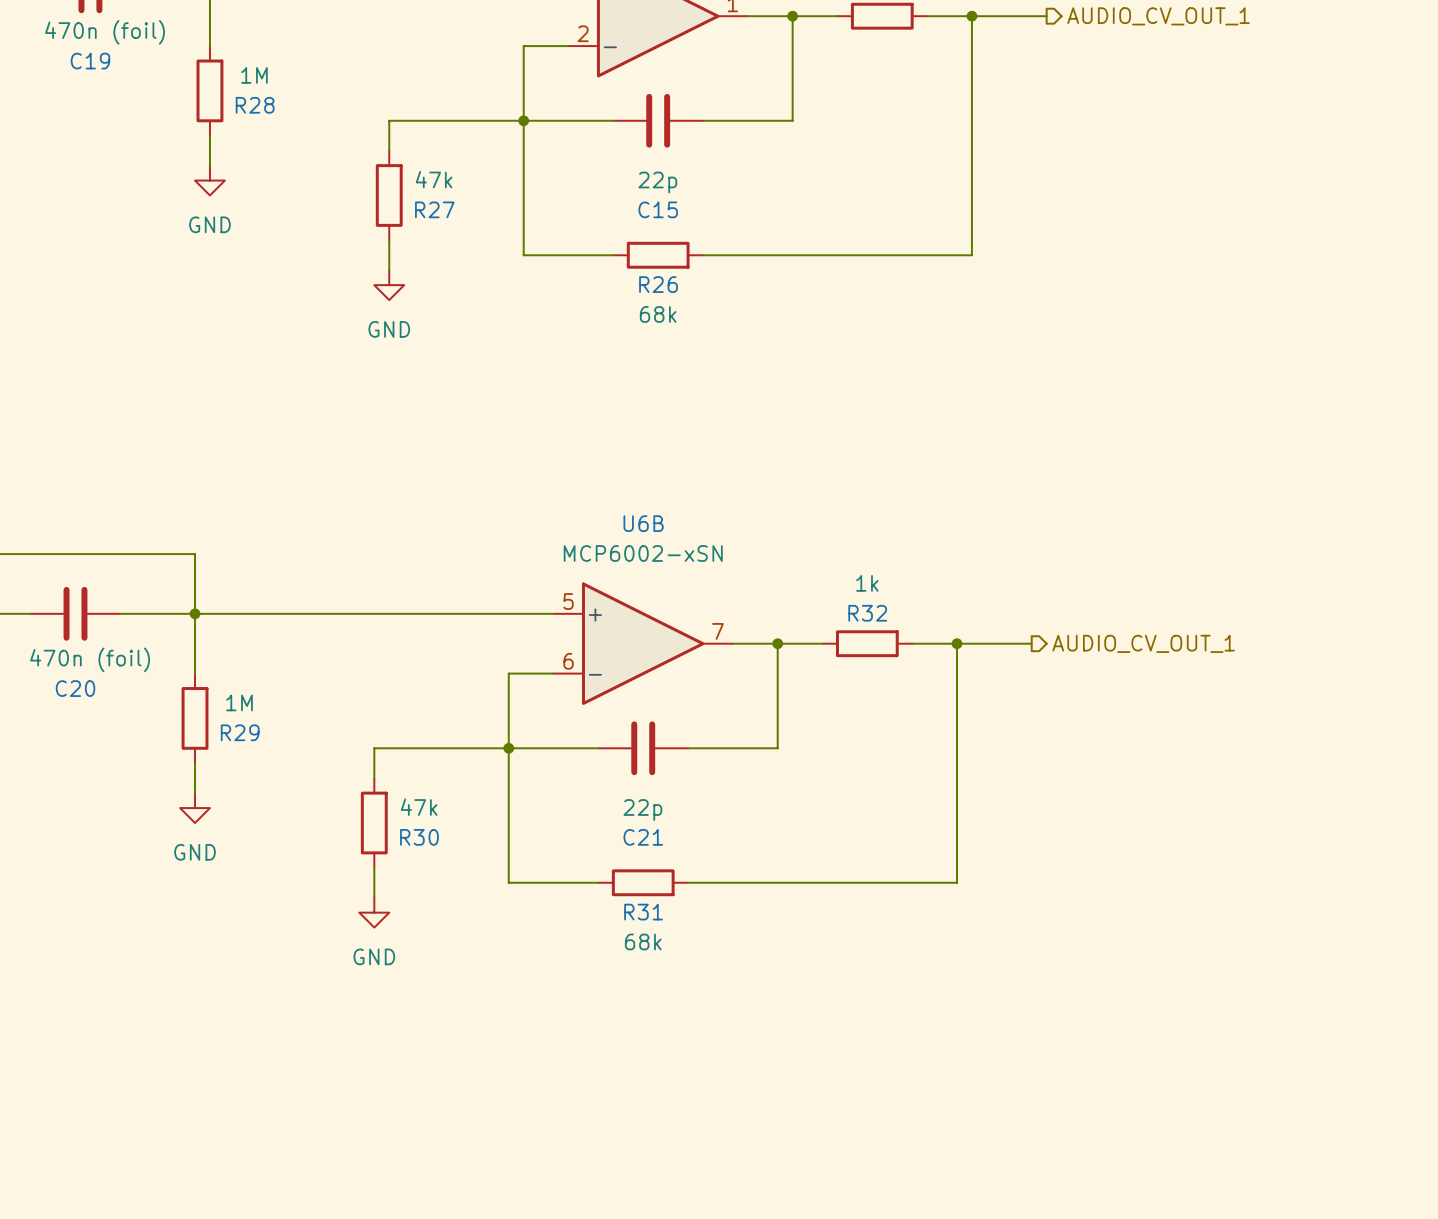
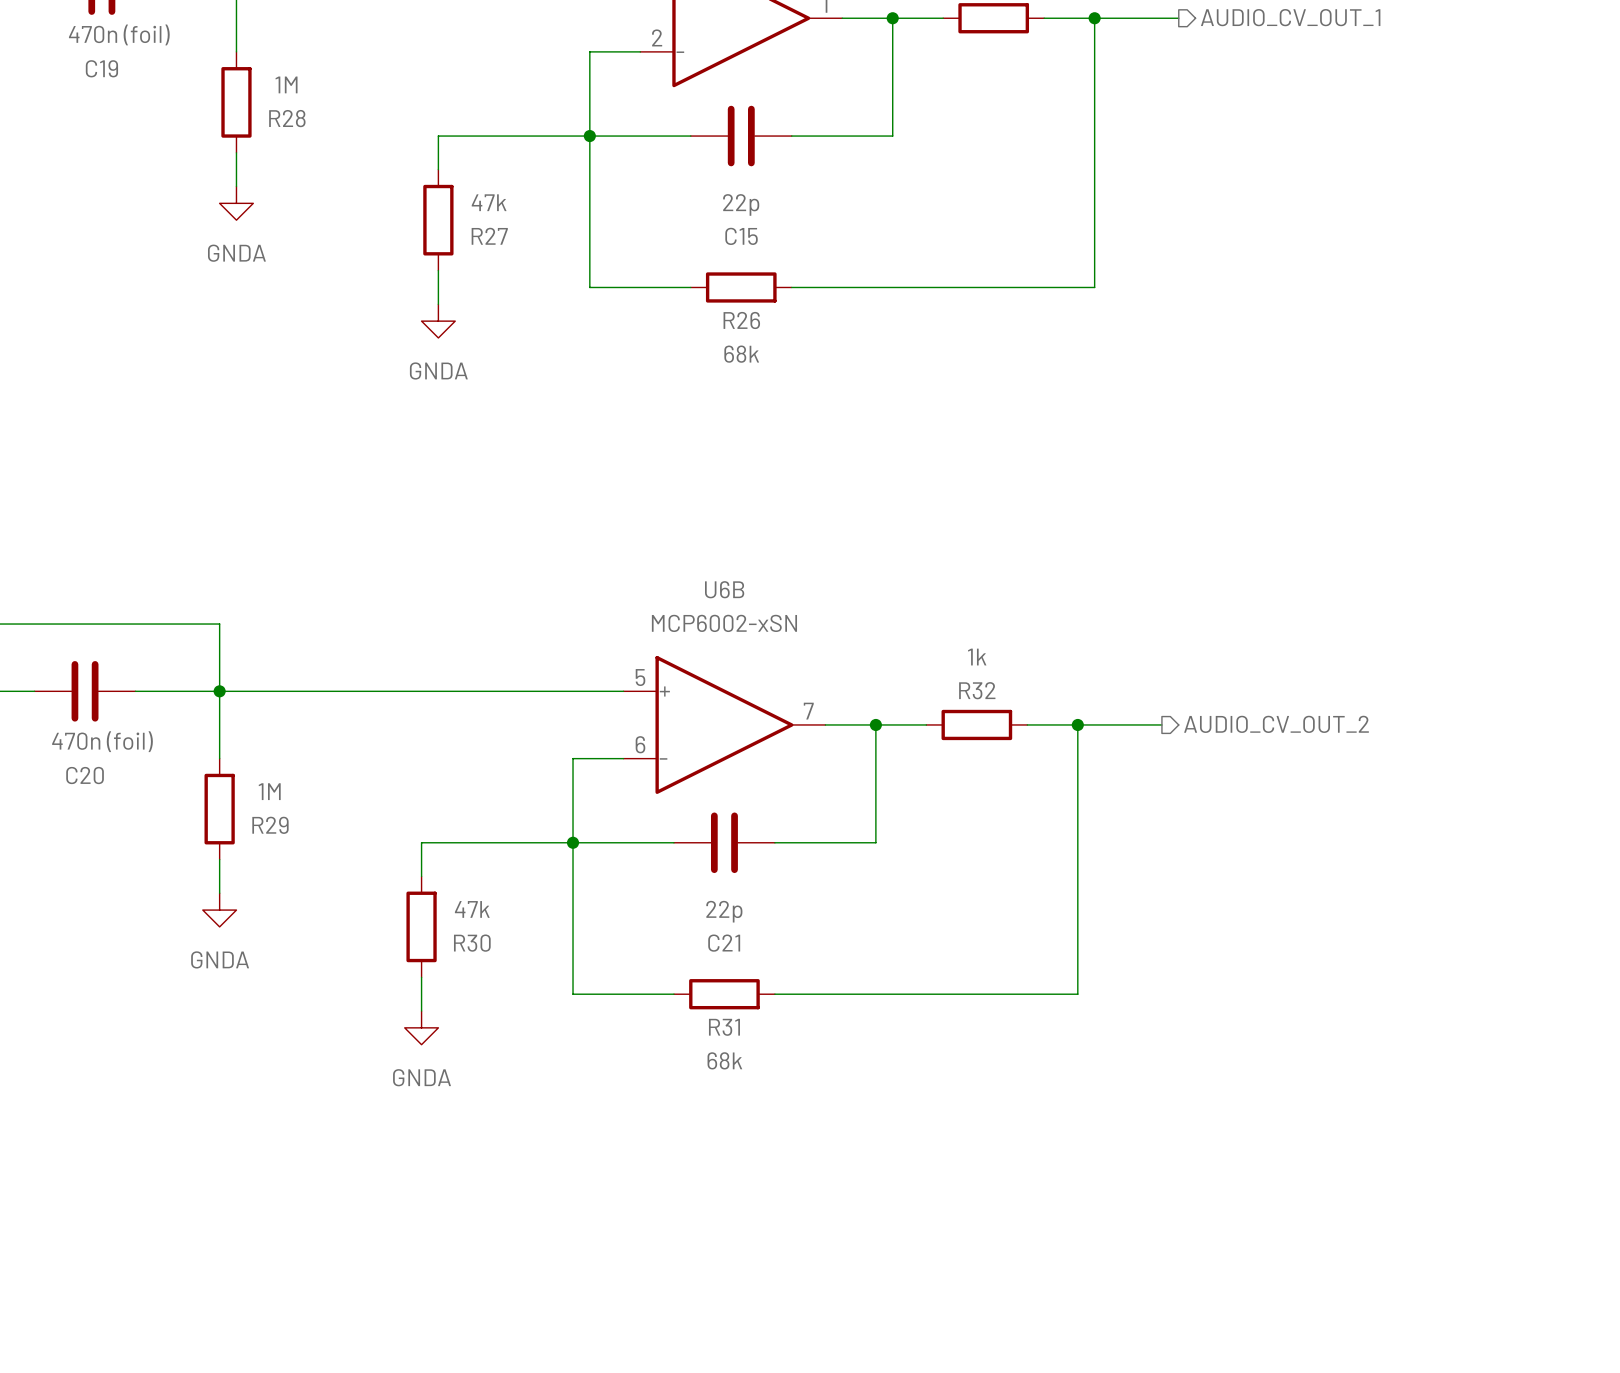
power symbol: GND (209, 180) -> GNDA (236, 203)
power symbol: GND (389, 285) -> GNDA (438, 321)
hierarchical label: AUDIO_CV_OUT_1 (1143, 643) -> AUDIO_CV_OUT_2 (1276, 724)
power symbol: GND (195, 808) -> GNDA (219, 910)
power symbol: GND (374, 912) -> GNDA (421, 1027)

